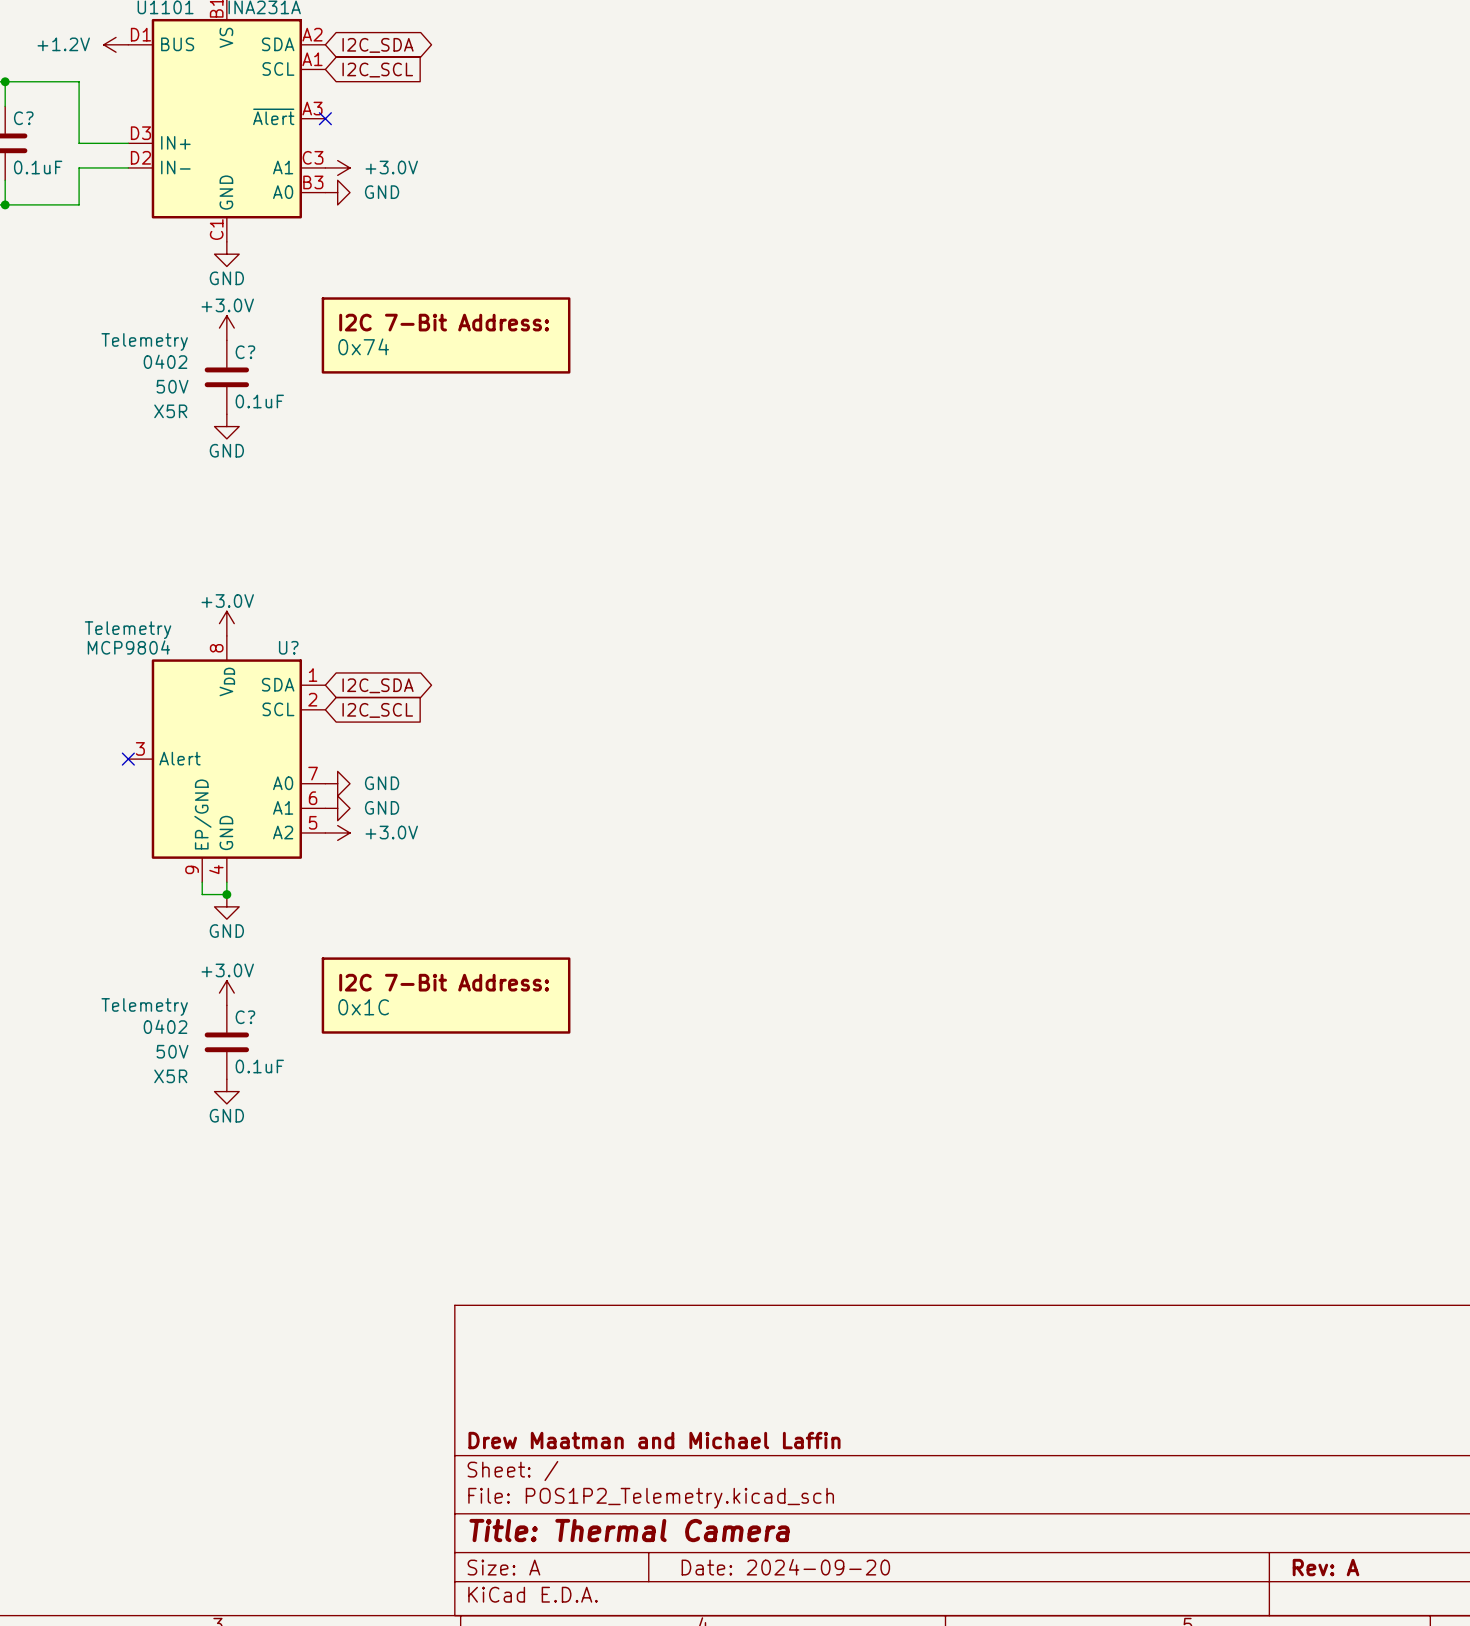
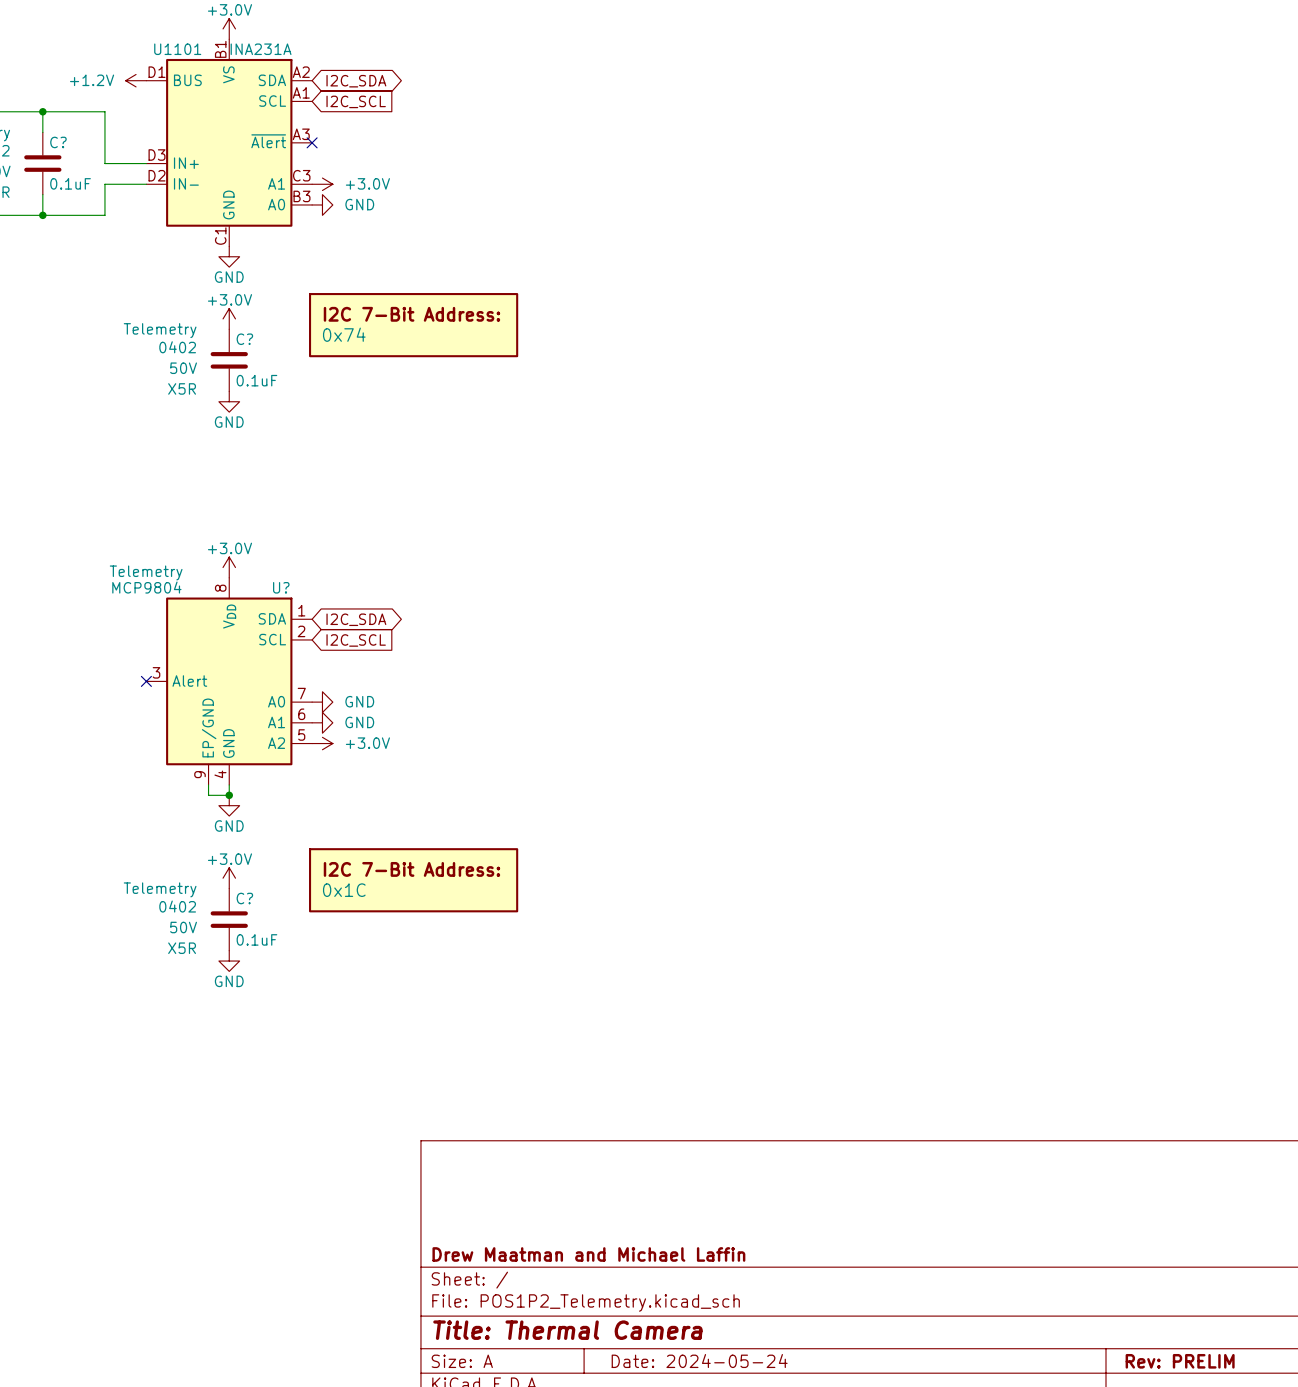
title block: Date: 2024-09-20 (785, 1567) -> Date: 2024-05-24 (699, 1361)
title block: Rev: A (1326, 1567) -> Rev: PRELIM (1180, 1361)

